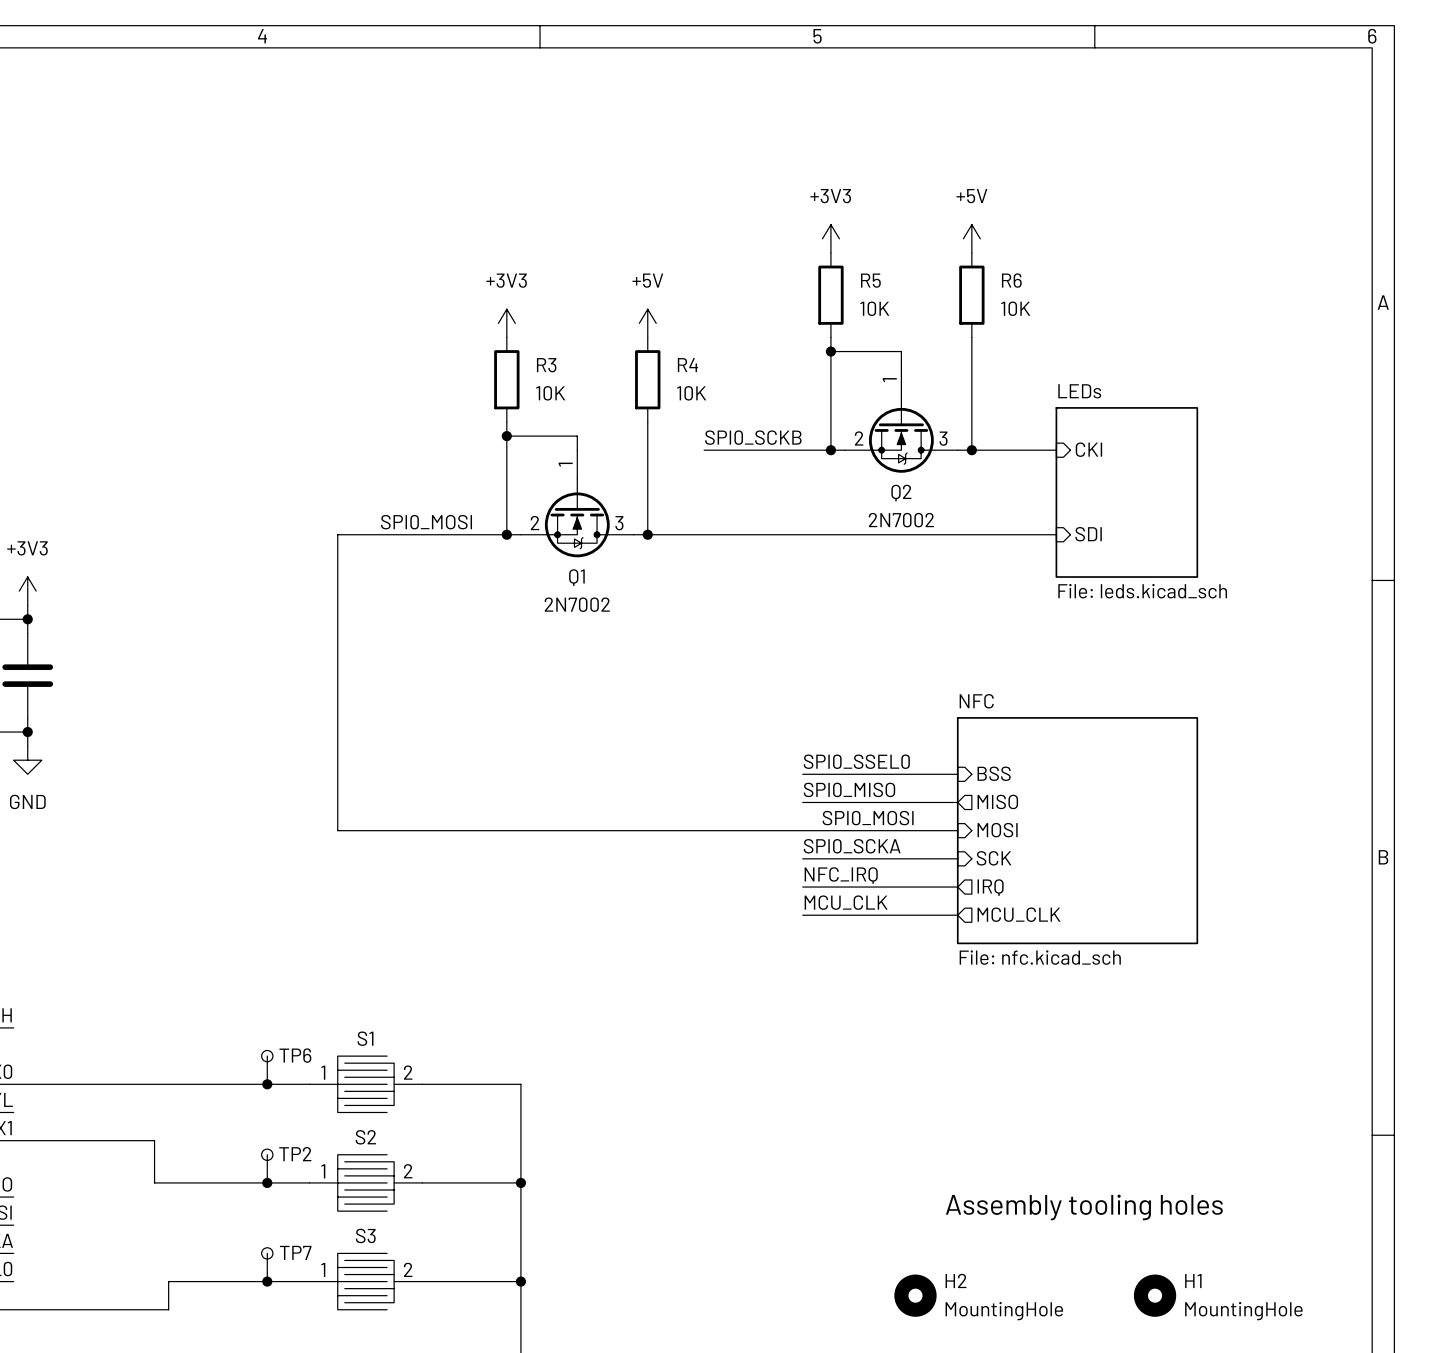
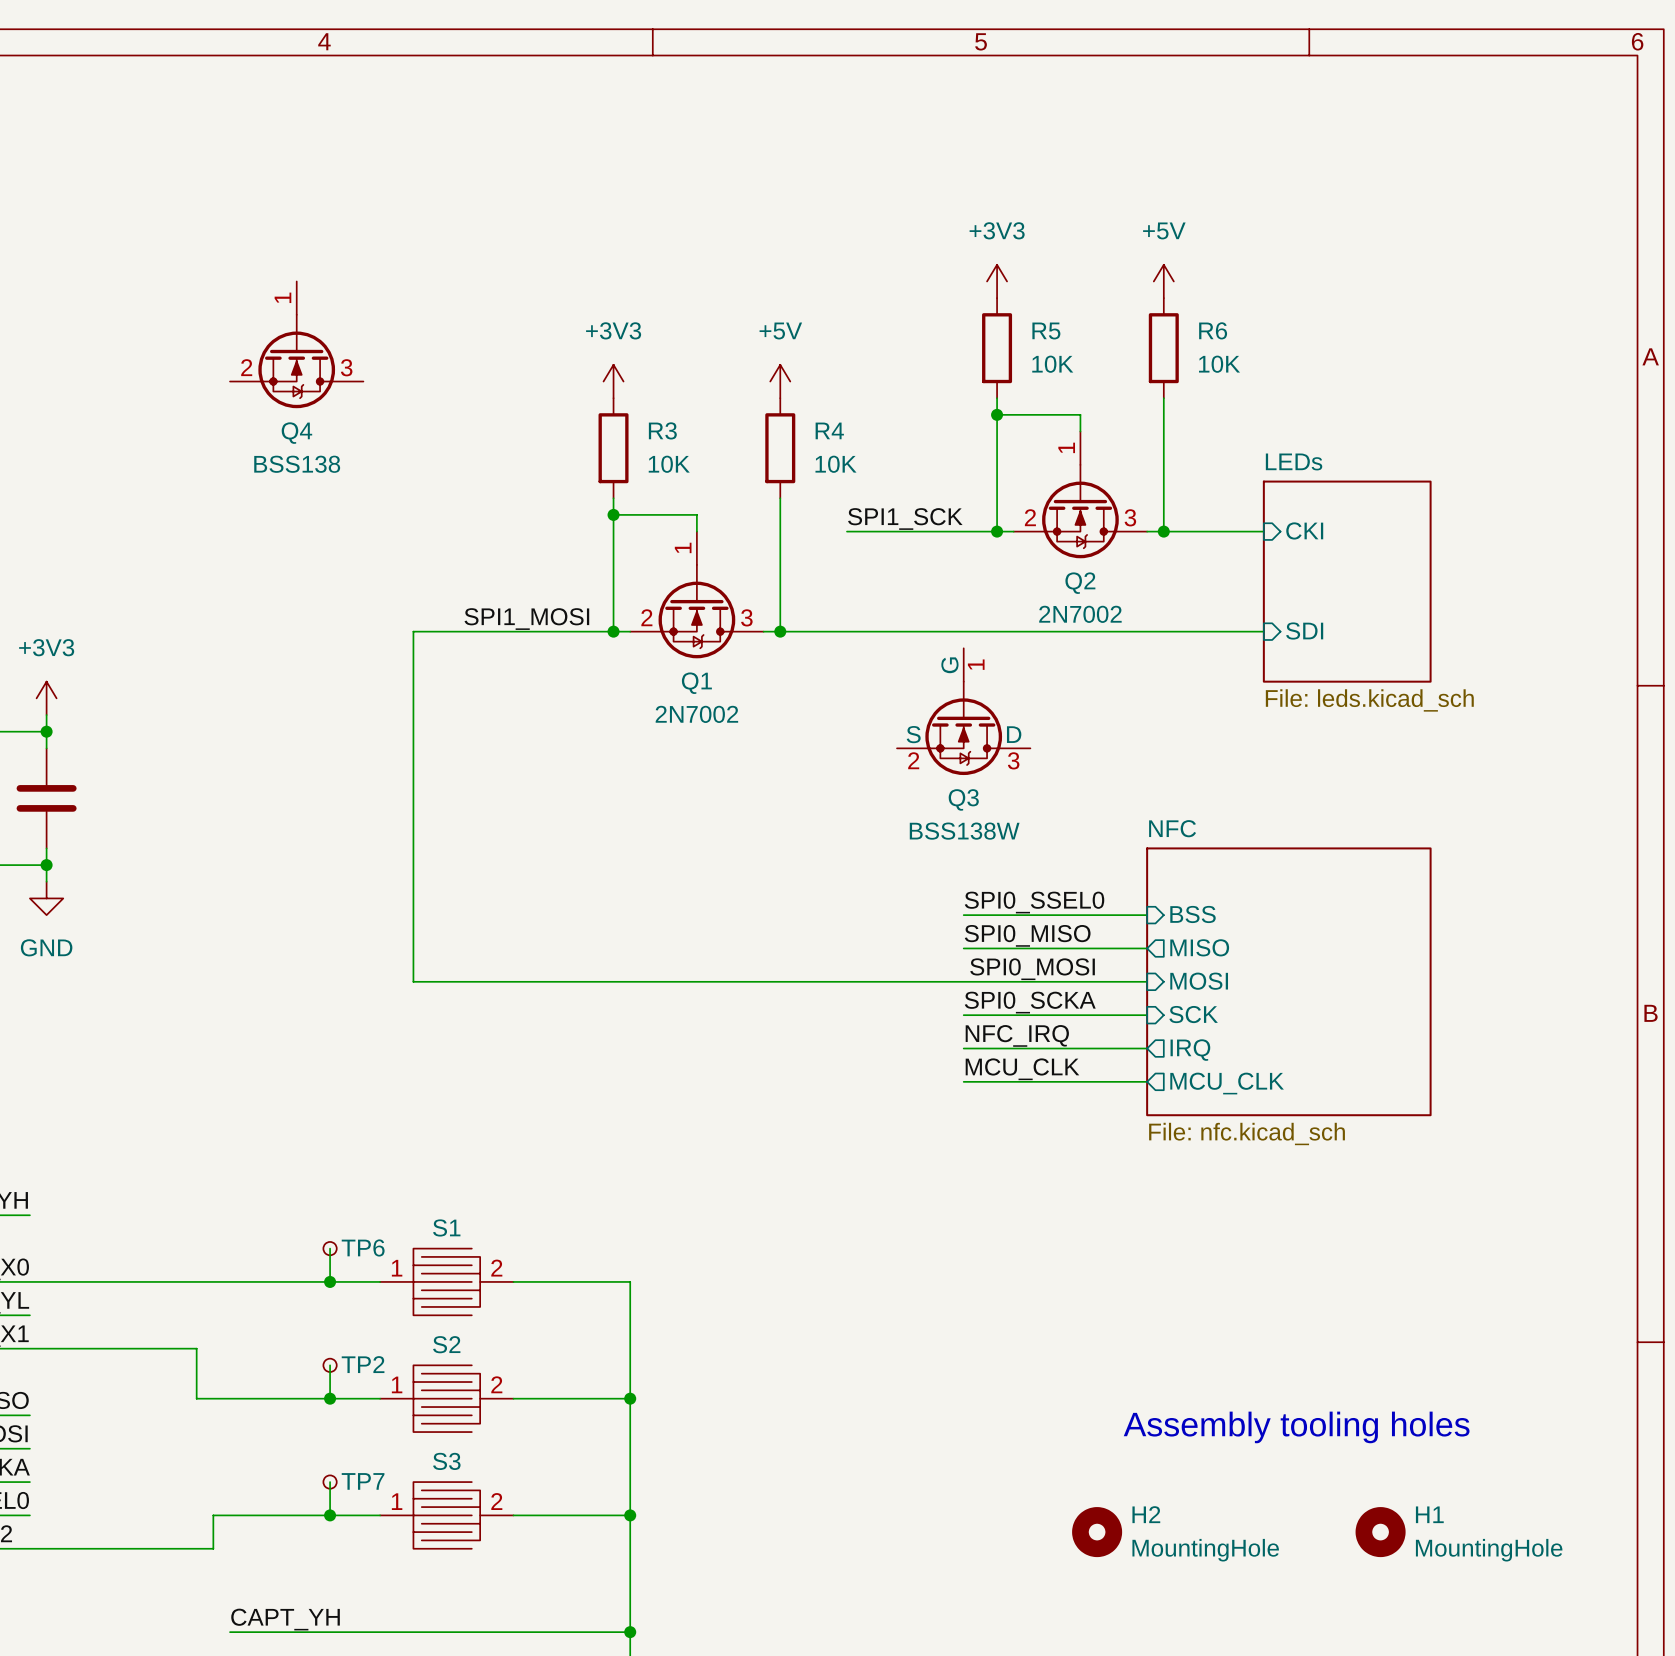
Q4: none -> BSS138 (296, 344)
label: SPI0_SCKB (753, 437) -> SPI1_SCK (905, 519)
label: SPI0_MOSI (426, 522) -> SPI1_MOSI (526, 619)
Q3: none -> BSS138W (963, 711)

